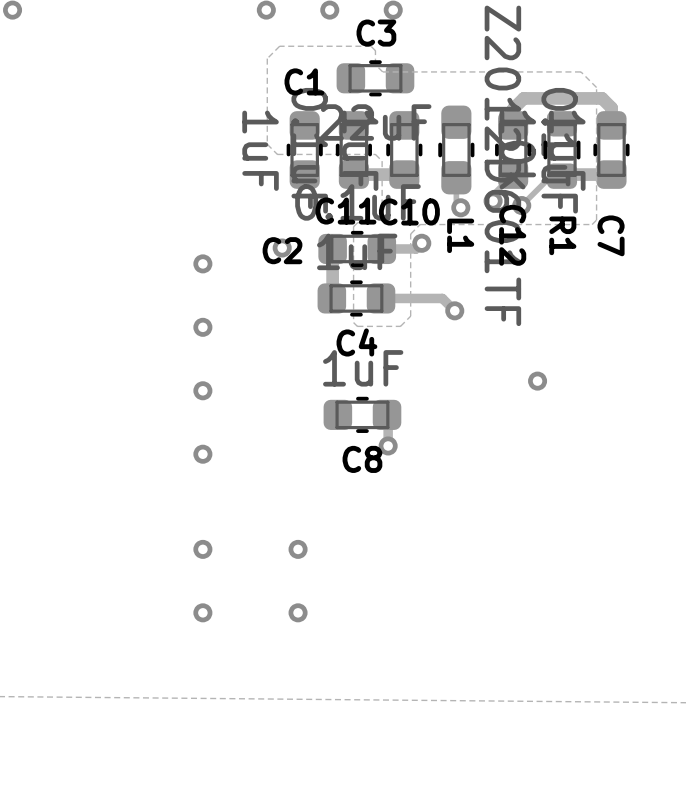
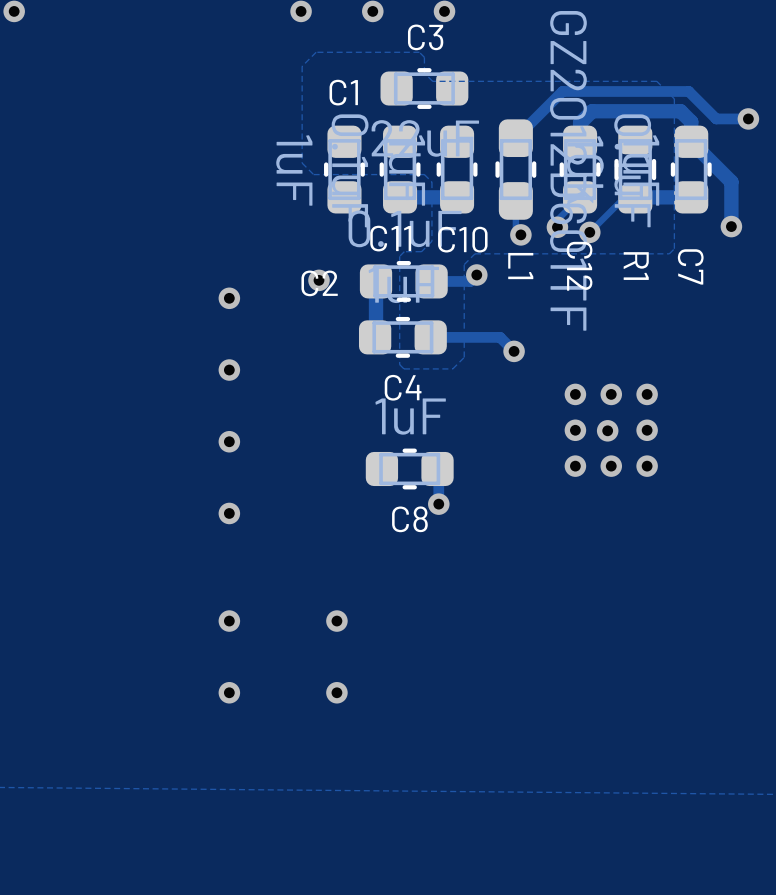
track: none -> (748, 118) (716, 118) (688, 91) (562, 91) (515, 138)
via: none -> (748, 118)
track: none -> (691, 141) (731, 181) (731, 226)
via: none -> (731, 226)
via: none -> (575, 394)
via: none -> (611, 394)
via: none -> (647, 394)
via: none -> (575, 430)
via: none -> (647, 430)
via: none -> (575, 466)
via: none -> (611, 466)
via: none -> (647, 466)

